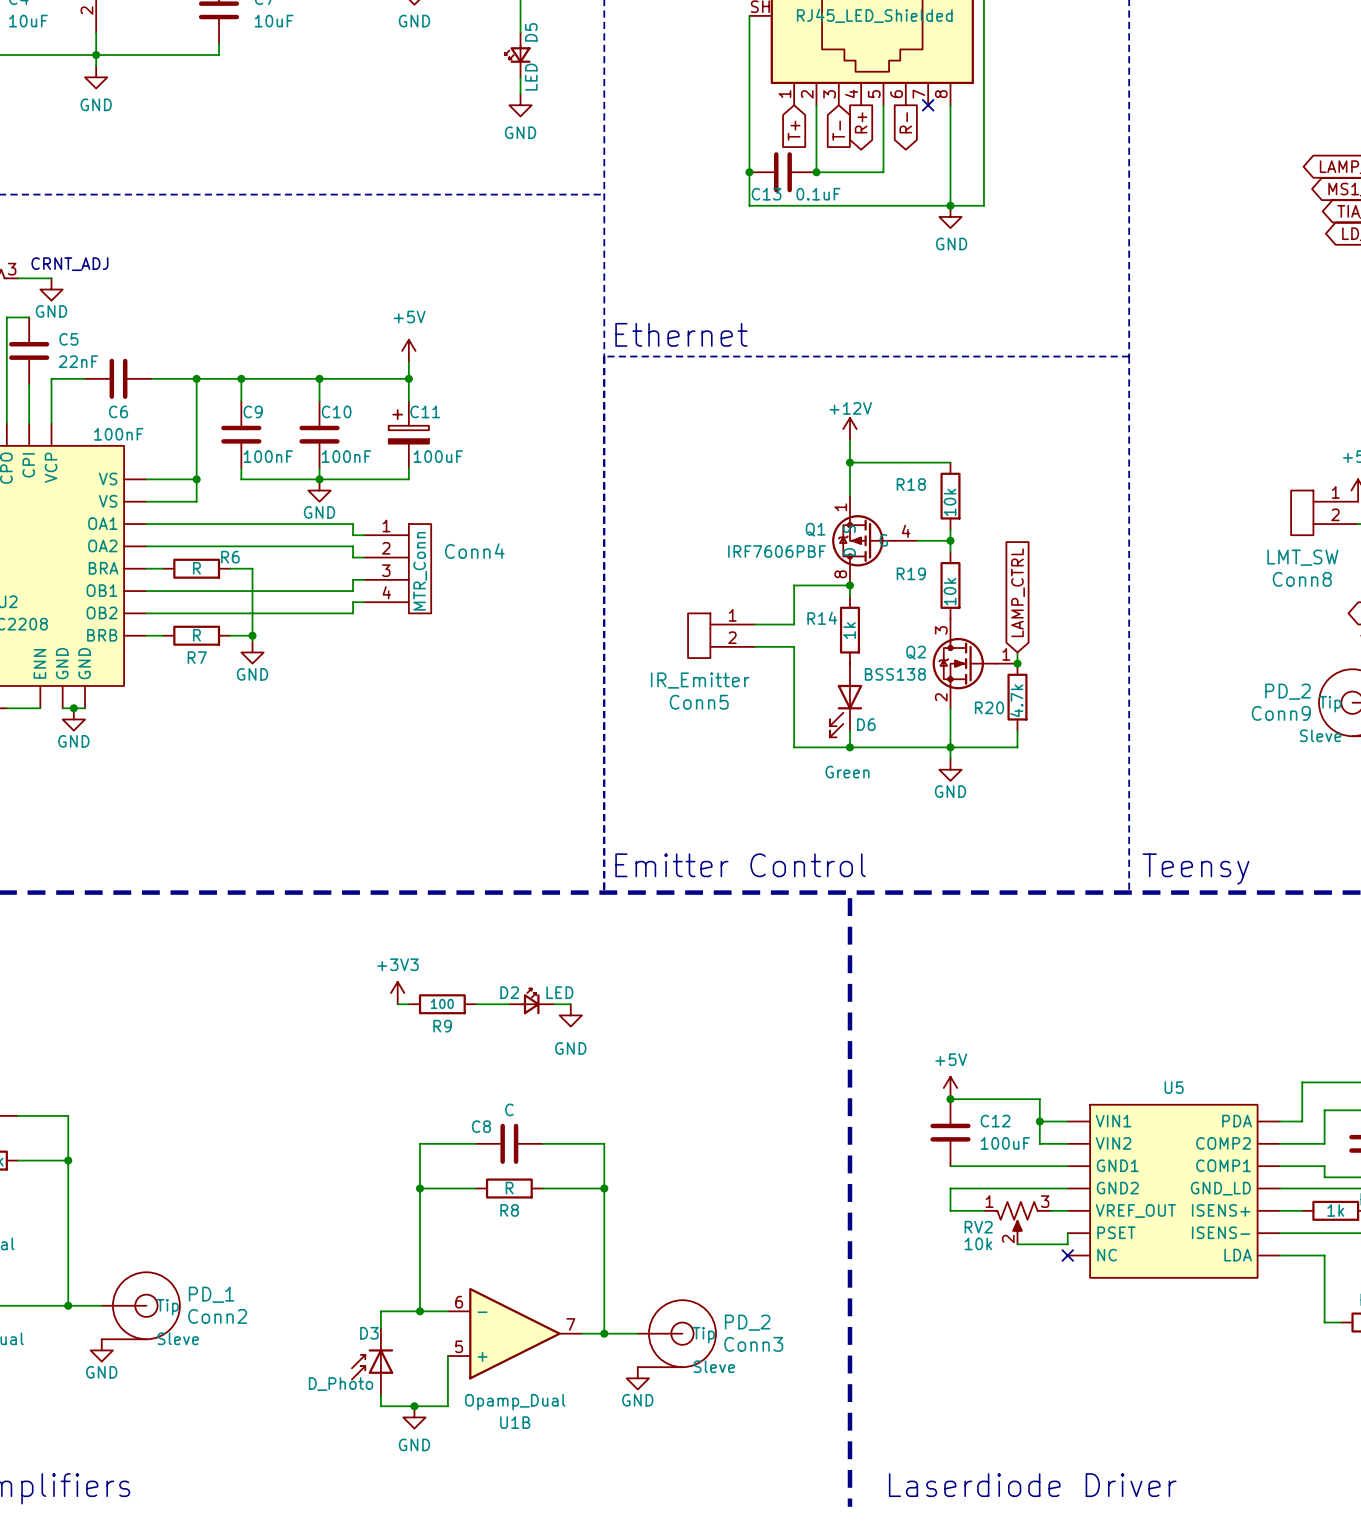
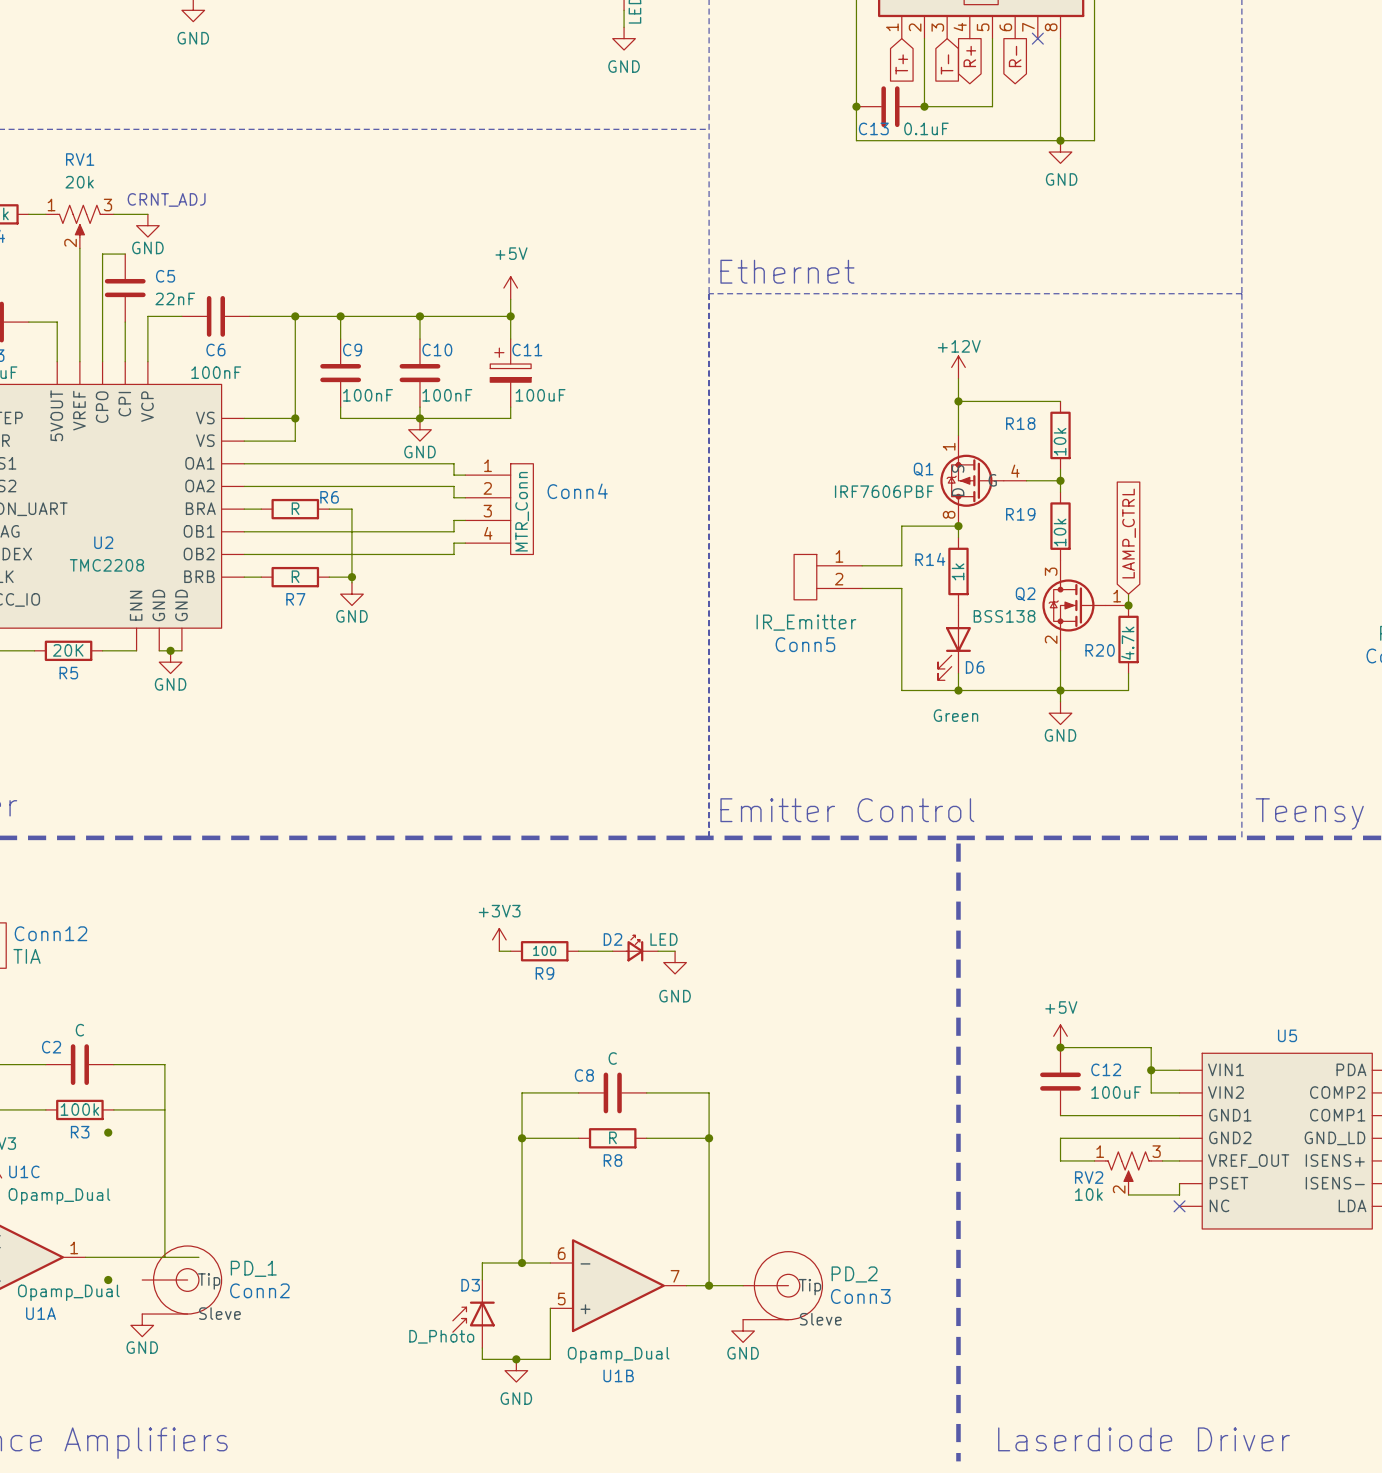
junction: (68, 1160) -> none
junction: none -> (108, 1132)
junction: (68, 1305) -> none
Conn2 position: (140, 1305) -> (181, 1280)
junction: none -> (108, 1280)
power symbol position: GND (101, 1350) -> GND (142, 1325)

